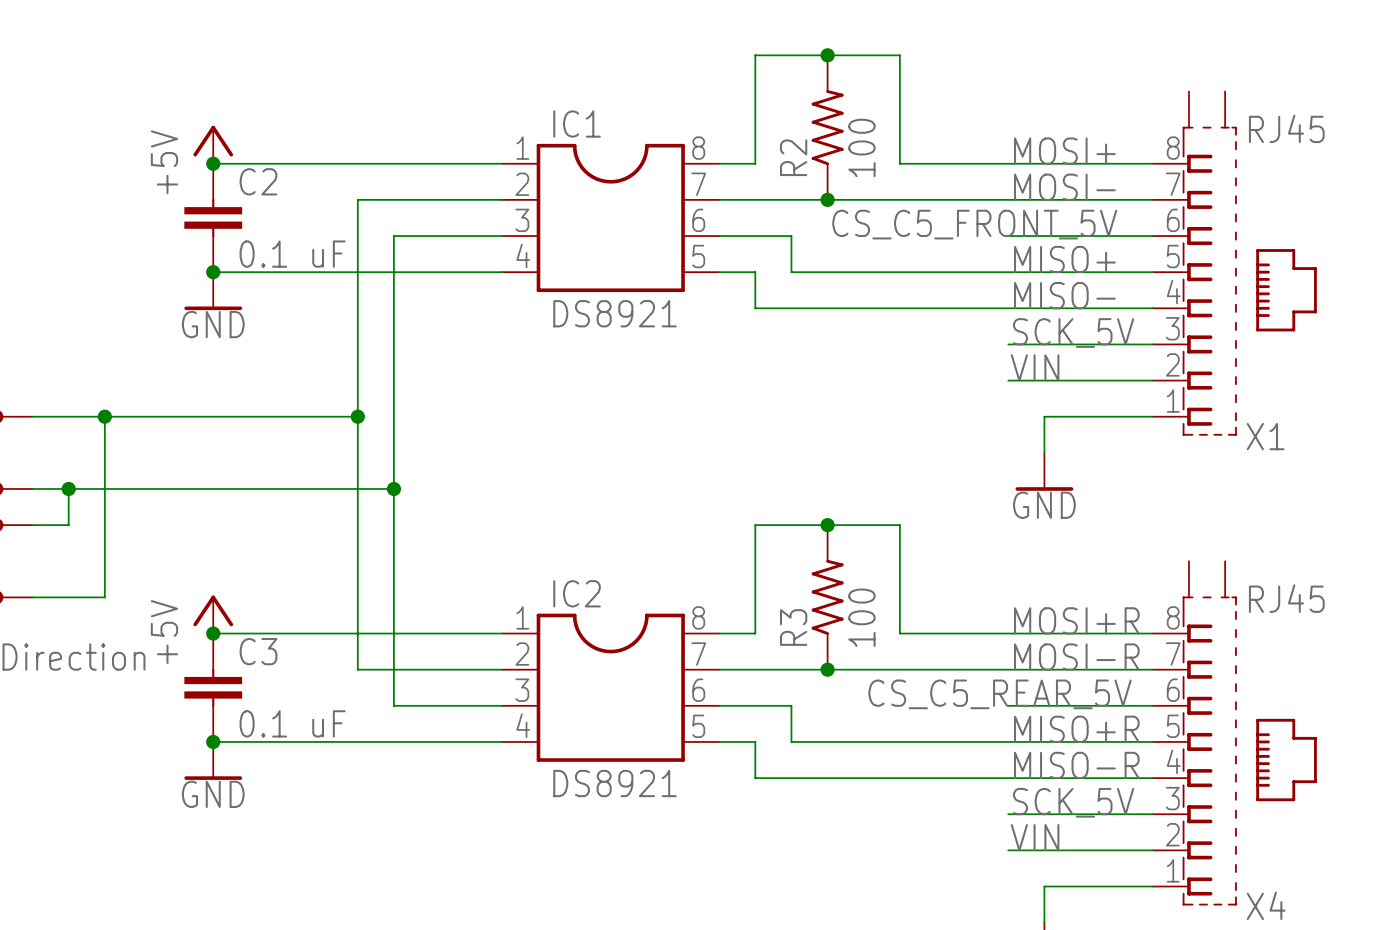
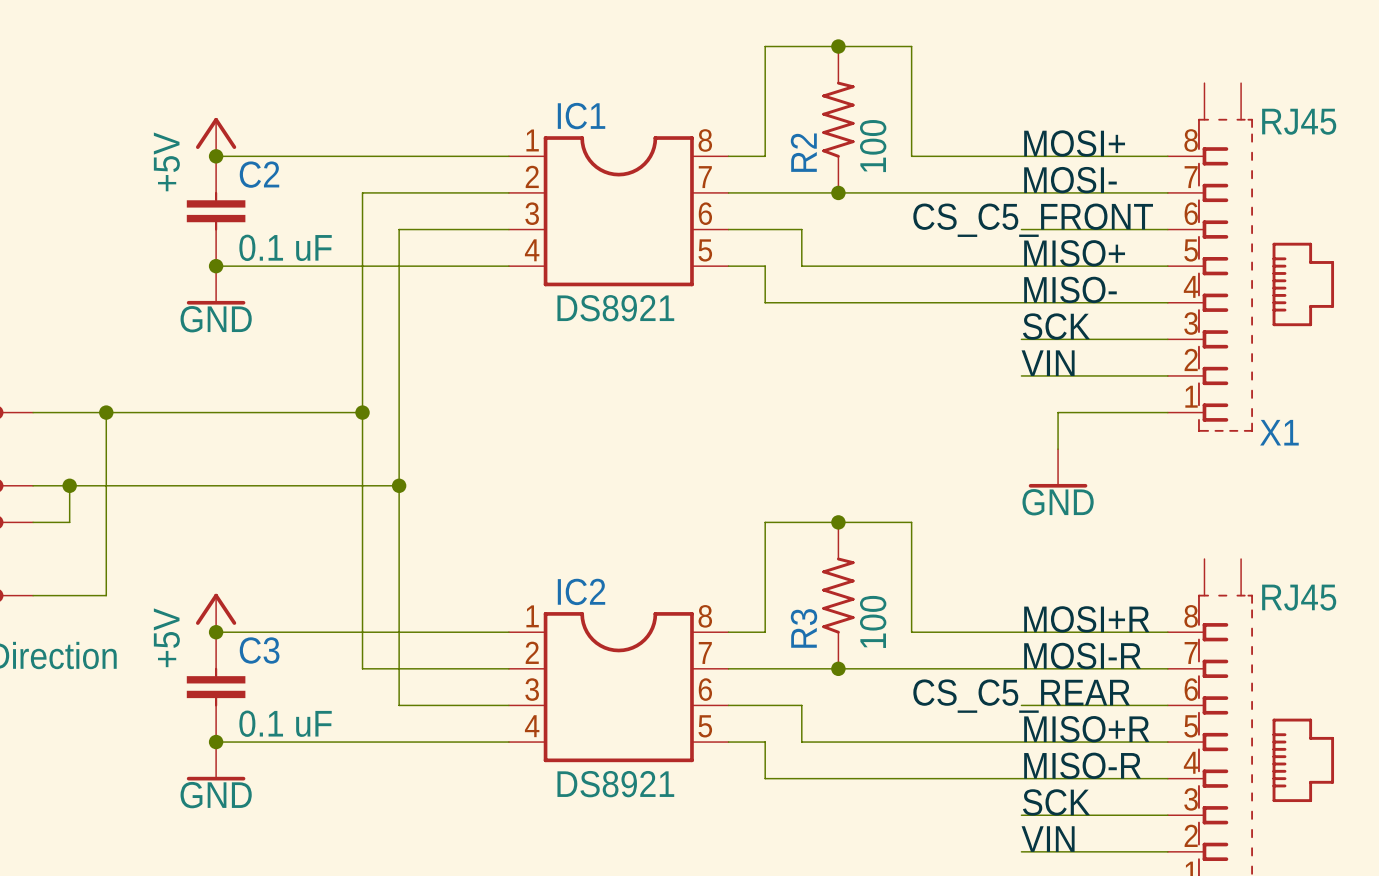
label: CS_C5_FRONT_5V (974, 224) -> CS_C5_FRONT (1033, 220)
label: SCK_5V (1073, 332) -> SCK (1056, 326)
label: CS_C5_REAR_5V (1000, 694) -> CS_C5_REAR (1021, 696)
label: SCK_5V (1073, 802) -> SCK (1056, 802)

